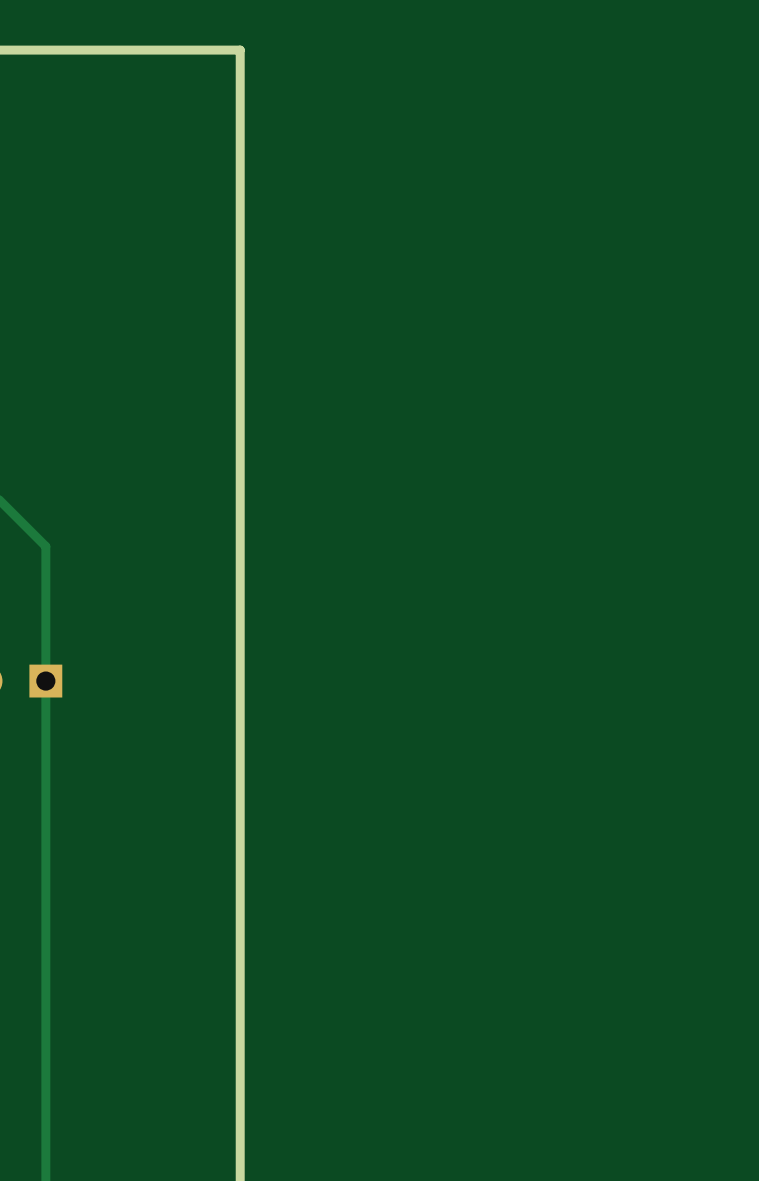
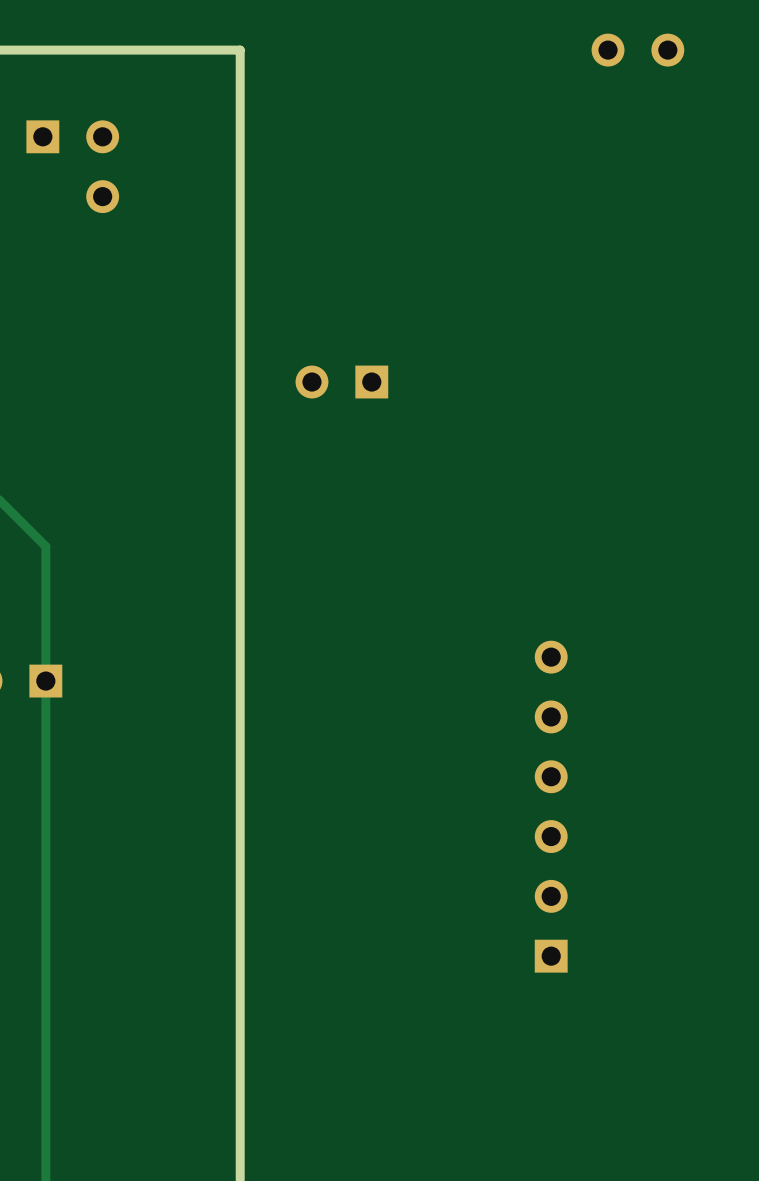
part: none -> (637, 50)
part: none -> (72, 166)
part: none -> (341, 382)
part: none -> (551, 806)

